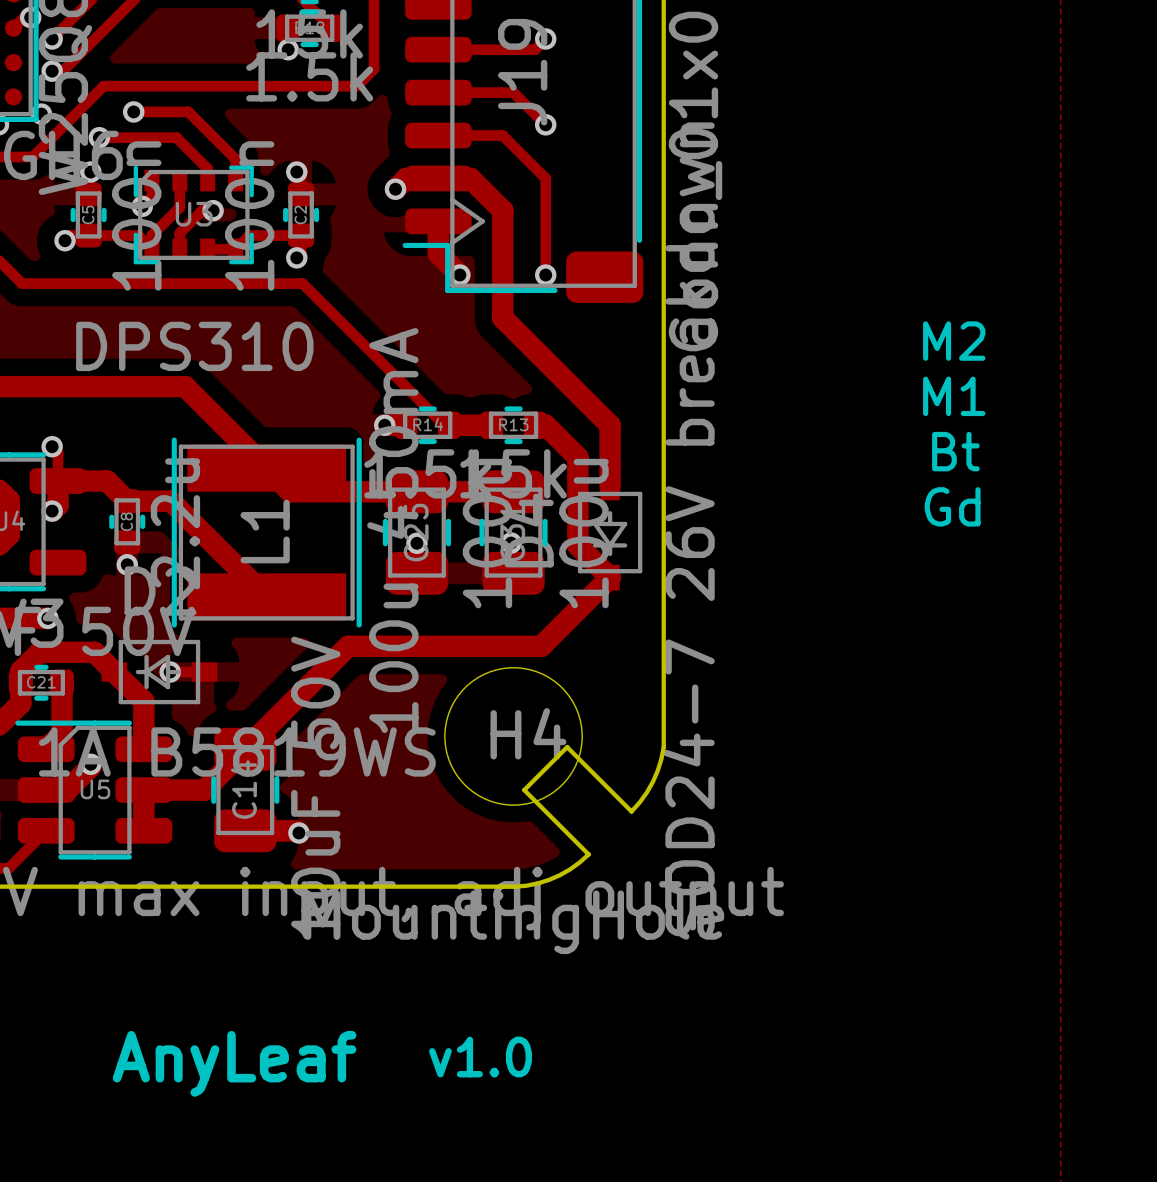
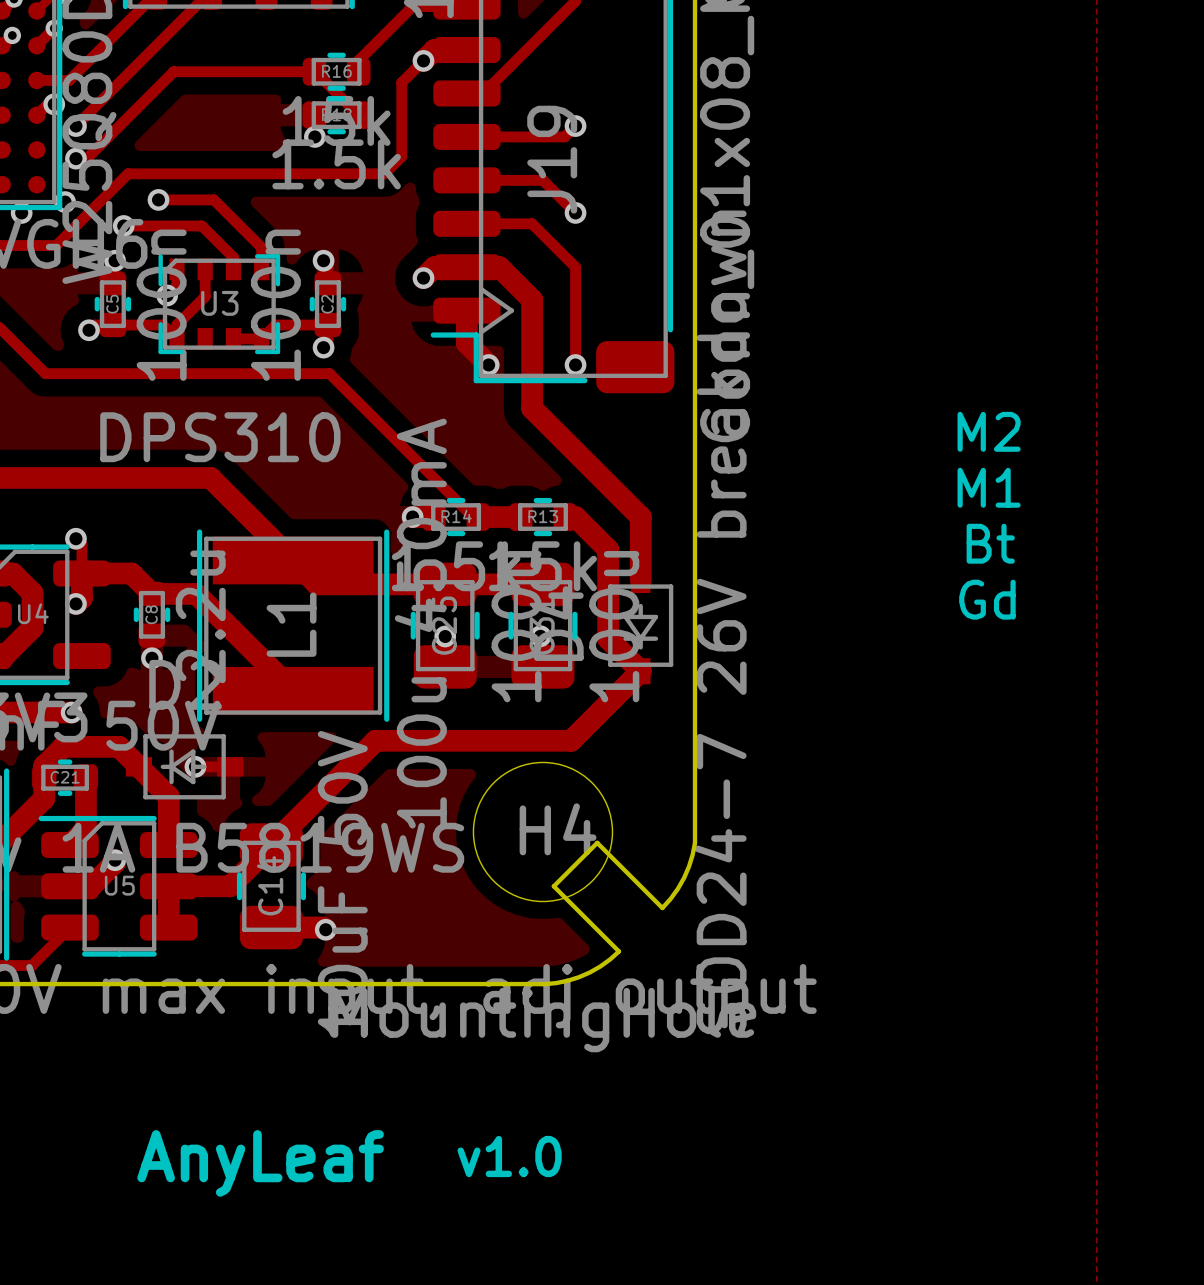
track: (213, 210) (202, 210) (179, 233) (179, 249) -> none
via: (213, 210) -> none

